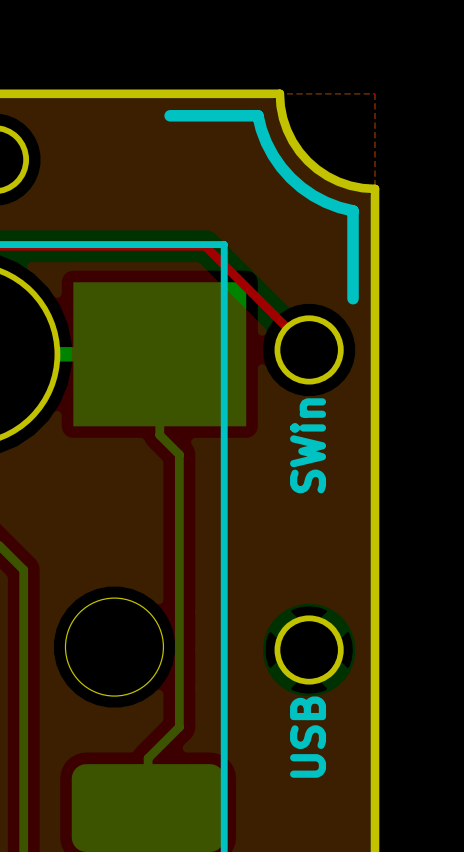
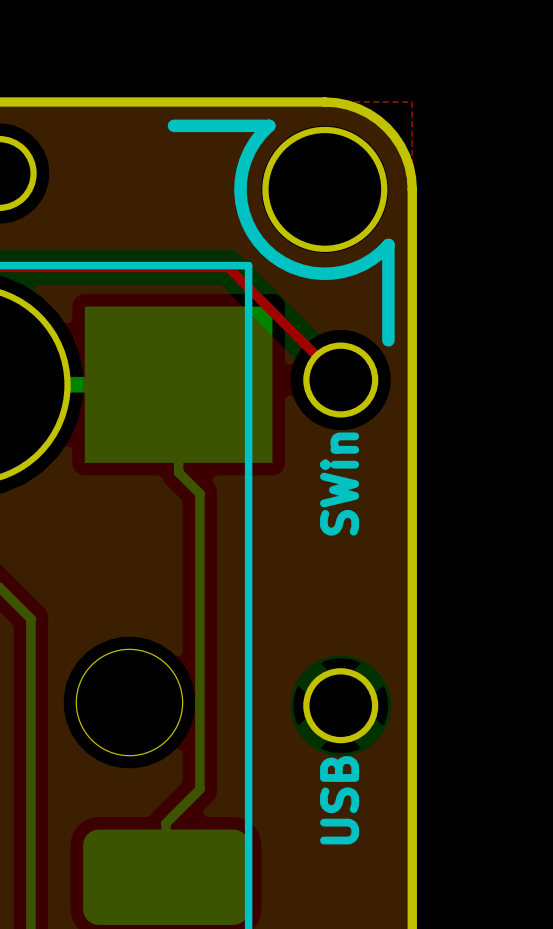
board edge: (279, 93) (280, 106) (287, 130) (299, 151) (307, 161) (327, 176) (338, 181) (362, 188) (374, 188) -> (308, 102) (347, 104) (368, 113) (386, 127) (400, 145) (409, 166) (412, 205)
line: none -> (173, 125) (189, 125)
line: (243, 115) (257, 115) (266, 142) (281, 167) (290, 178) (313, 195) (339, 207) (353, 210) (353, 225) -> (269, 125) (249, 150) (242, 170) (240, 191) (247, 222) (265, 249) (291, 266) (322, 273) (343, 271) (363, 264) (388, 244)
round board edge: none -> [262, 126, 388, 252]
line: none -> (388, 324) (388, 340)

